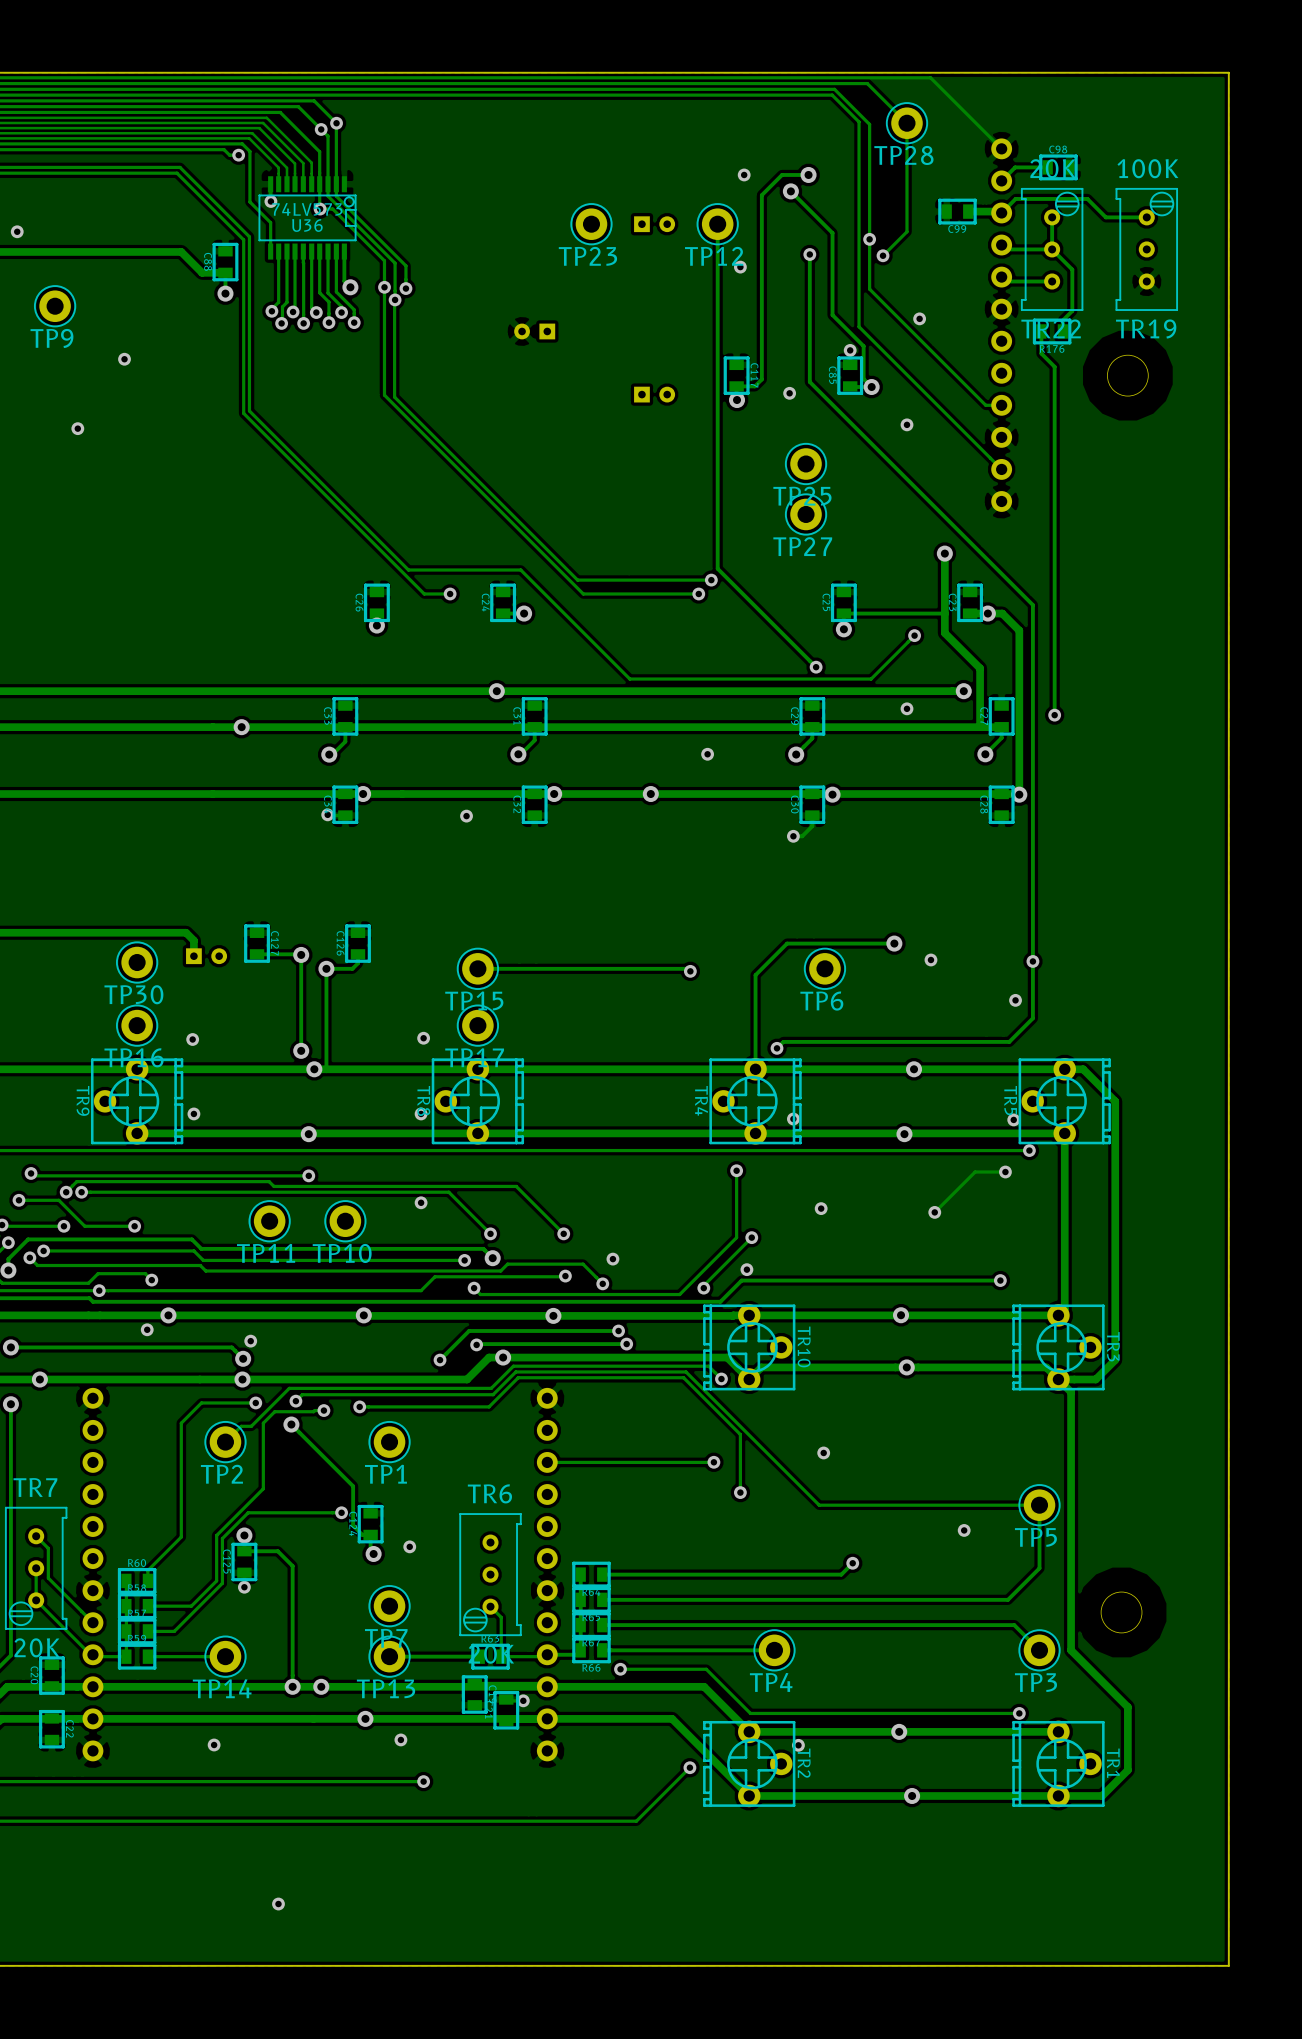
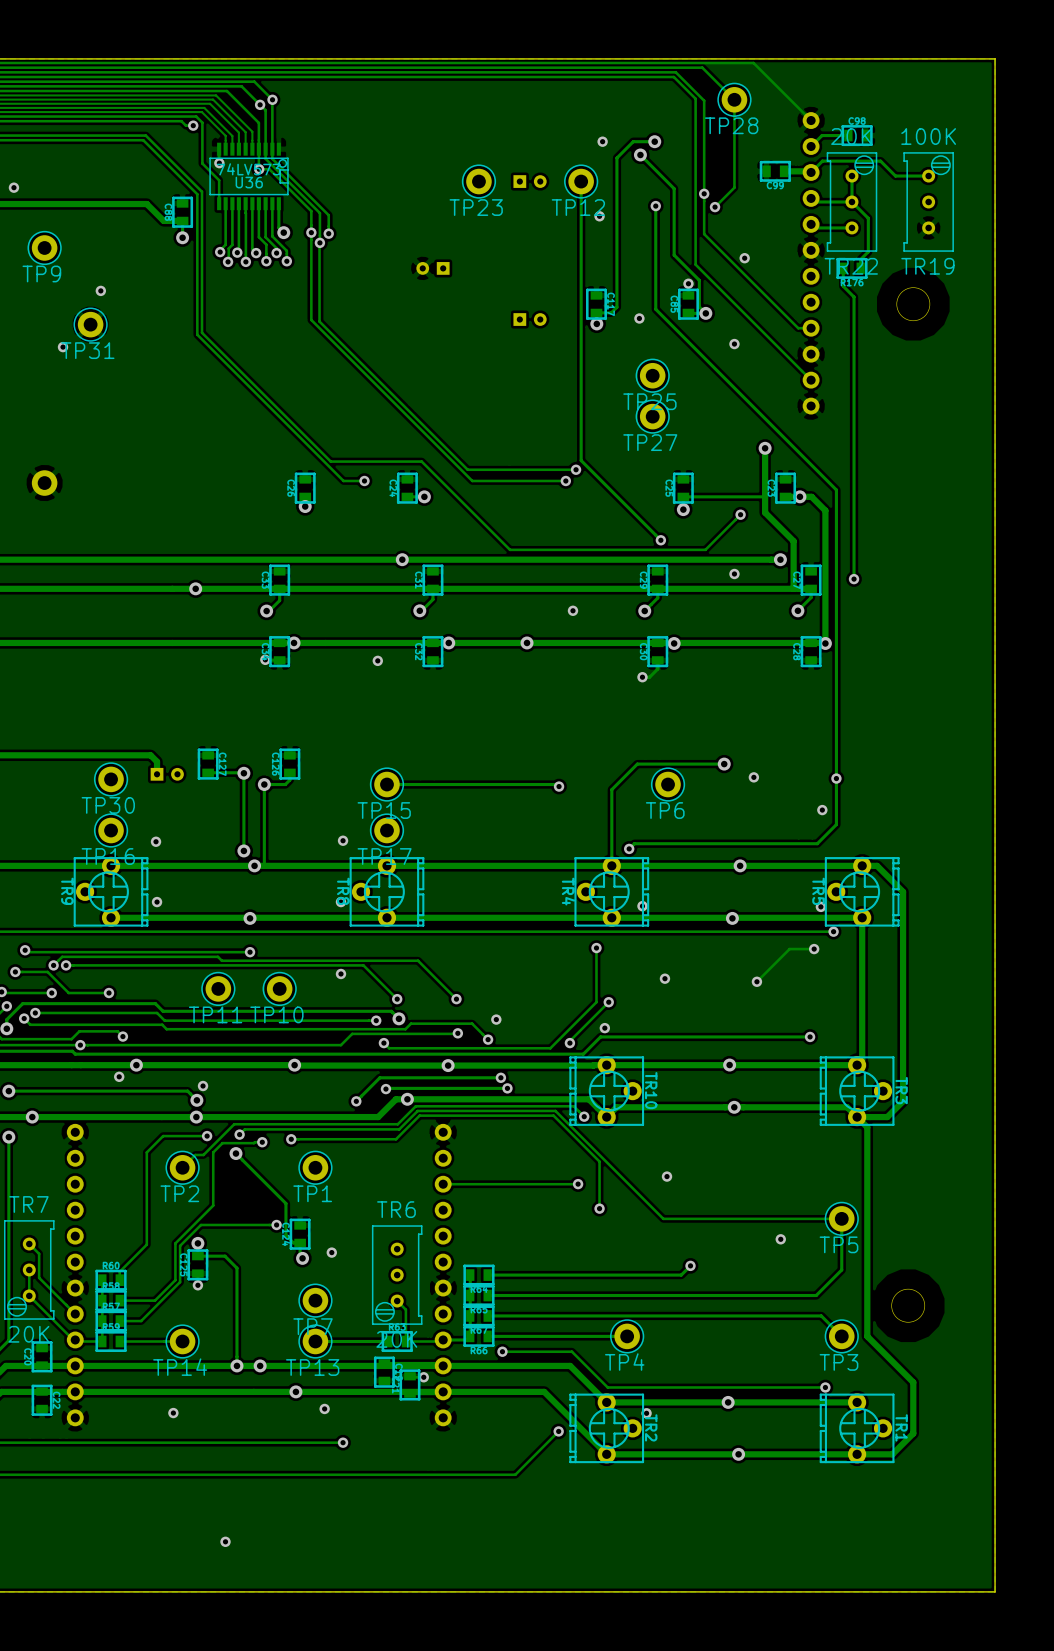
TP31: none -> (90, 324)
part: none -> (44, 483)

